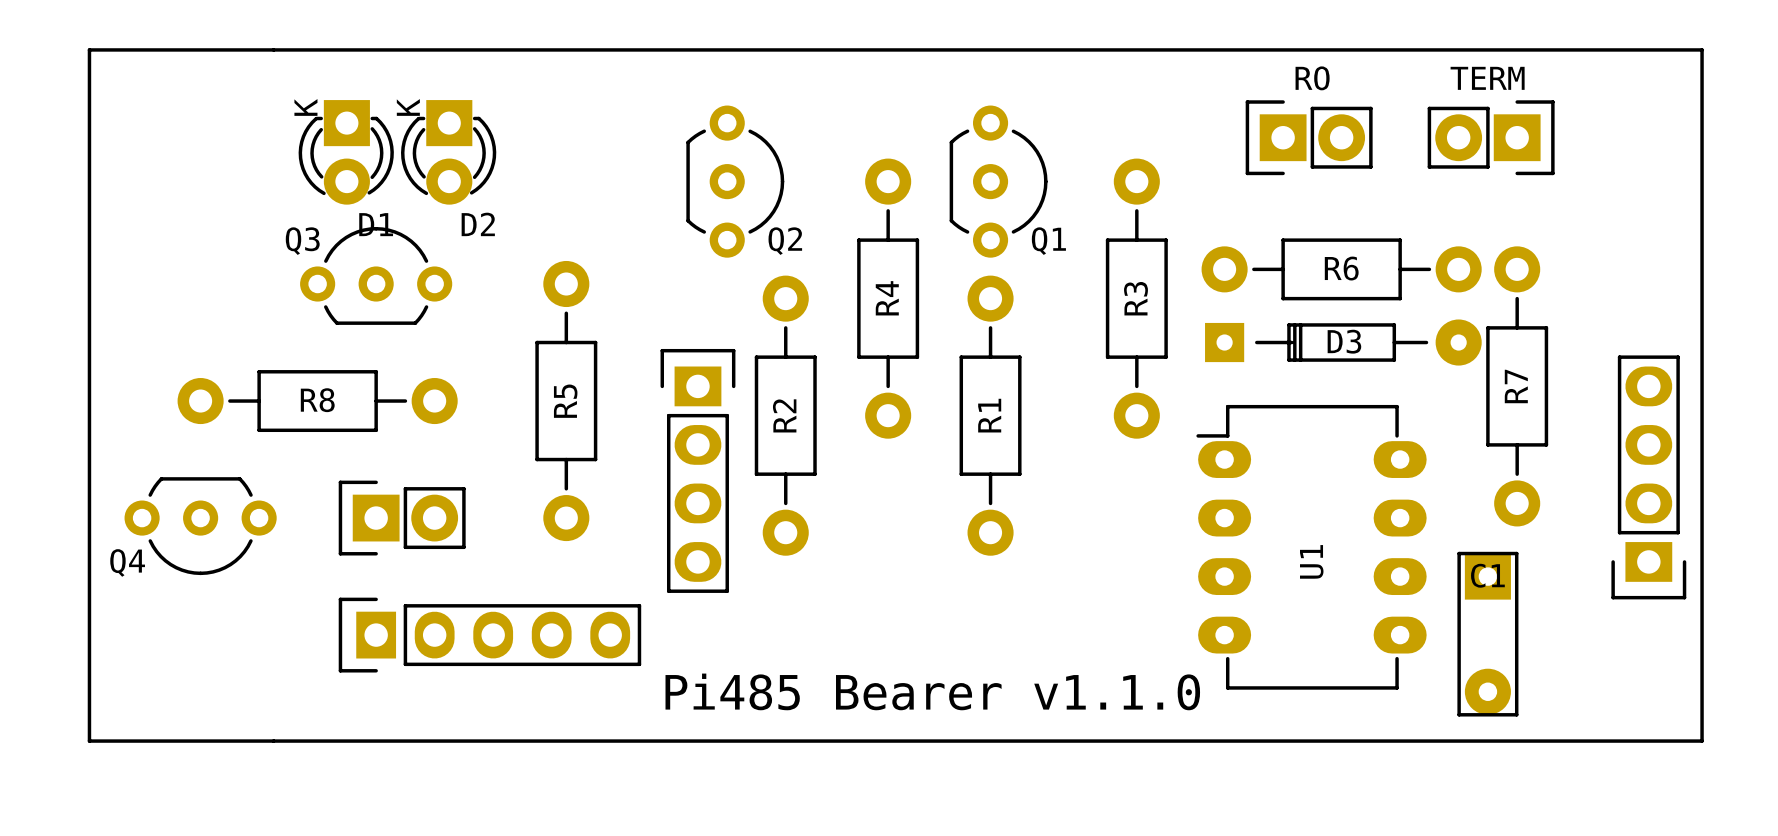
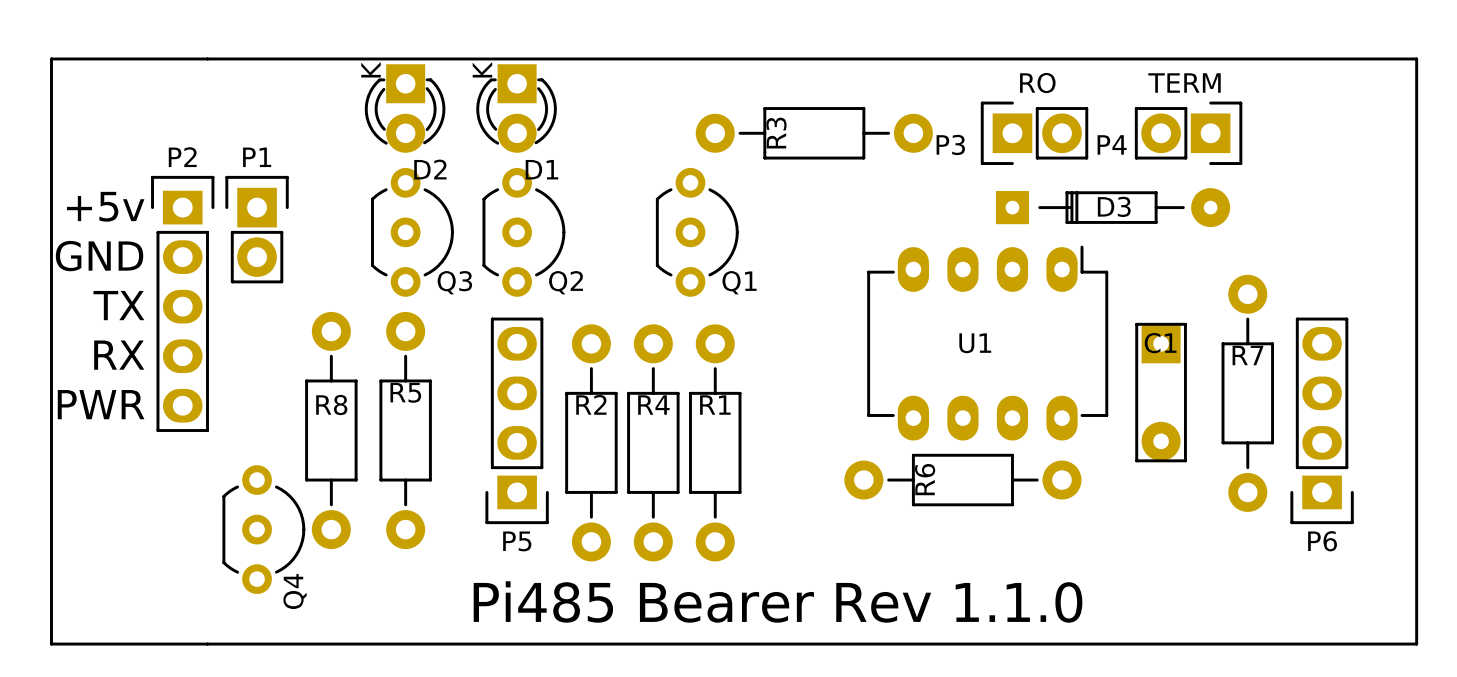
P3: none -> RO (1034, 133)
part: RO (1309, 137) -> none
P4: none -> TERM (1188, 133)
part: TERM (1491, 137) -> none
D1 position: (346, 152) -> (516, 108)
D2 position: (448, 152) -> (405, 108)
Q2 position: (735, 181) -> (523, 232)
Q1 position: (998, 181) -> (697, 232)
text: none -> +5v (105, 206)
Q3 name position: Q3 (302, 241) -> Q3 (454, 282)
P1: none -> (257, 229)
R6 name rotation: 0° (1341, 268) -> 90° counterclockwise (925, 479)
R6 position: (1341, 269) -> (962, 480)
Q3 rotation: 0° (376, 275) -> 90° clockwise (412, 232)
Q3 position: (376, 275) -> (412, 232)
text: none -> GND (99, 256)
R4 name rotation: 0° (887, 298) -> 90° clockwise (653, 405)
R4 position: (888, 298) -> (653, 442)
R3 rotation: 0° (1136, 298) -> 90° clockwise (814, 133)
R3 position: (1136, 298) -> (814, 133)
P2: none -> (182, 303)
text: none -> TX (118, 305)
D3 position: (1343, 342) -> (1113, 207)
R7 name rotation: 0° (1516, 386) -> 90° clockwise (1247, 355)
R7 position: (1517, 386) -> (1247, 393)
text: none -> RX (119, 355)
R8 rotation: 0° (317, 401) -> 90° clockwise (331, 430)
R5 name rotation: 0° (565, 401) -> 90° clockwise (405, 392)
R5 position: (566, 401) -> (405, 430)
R2 name rotation: 0° (784, 415) -> 90° clockwise (591, 404)
R2 position: (785, 415) -> (591, 442)
R1 name rotation: 0° (989, 415) -> 90° clockwise (715, 405)
R1 position: (990, 415) -> (715, 442)
text: none -> PWR (101, 404)
part: (697, 470) -> none
P5: none -> (517, 420)
P6: none -> (1322, 420)
part: (1648, 477) -> none
part: (402, 518) -> none
Q4 rotation: 0° (200, 526) -> 90° counterclockwise (263, 529)
Q4 position: (200, 526) -> (263, 529)
U1 rotation: 0° (1311, 547) -> 90° clockwise (987, 343)
U1 position: (1311, 547) -> (987, 343)
C1 position: (1487, 634) -> (1161, 392)
part: (489, 635) -> none
text: Pi485 Bearer v1.1.0 (932, 691) -> Pi485 Bearer Rev 1.1.0 (778, 601)

